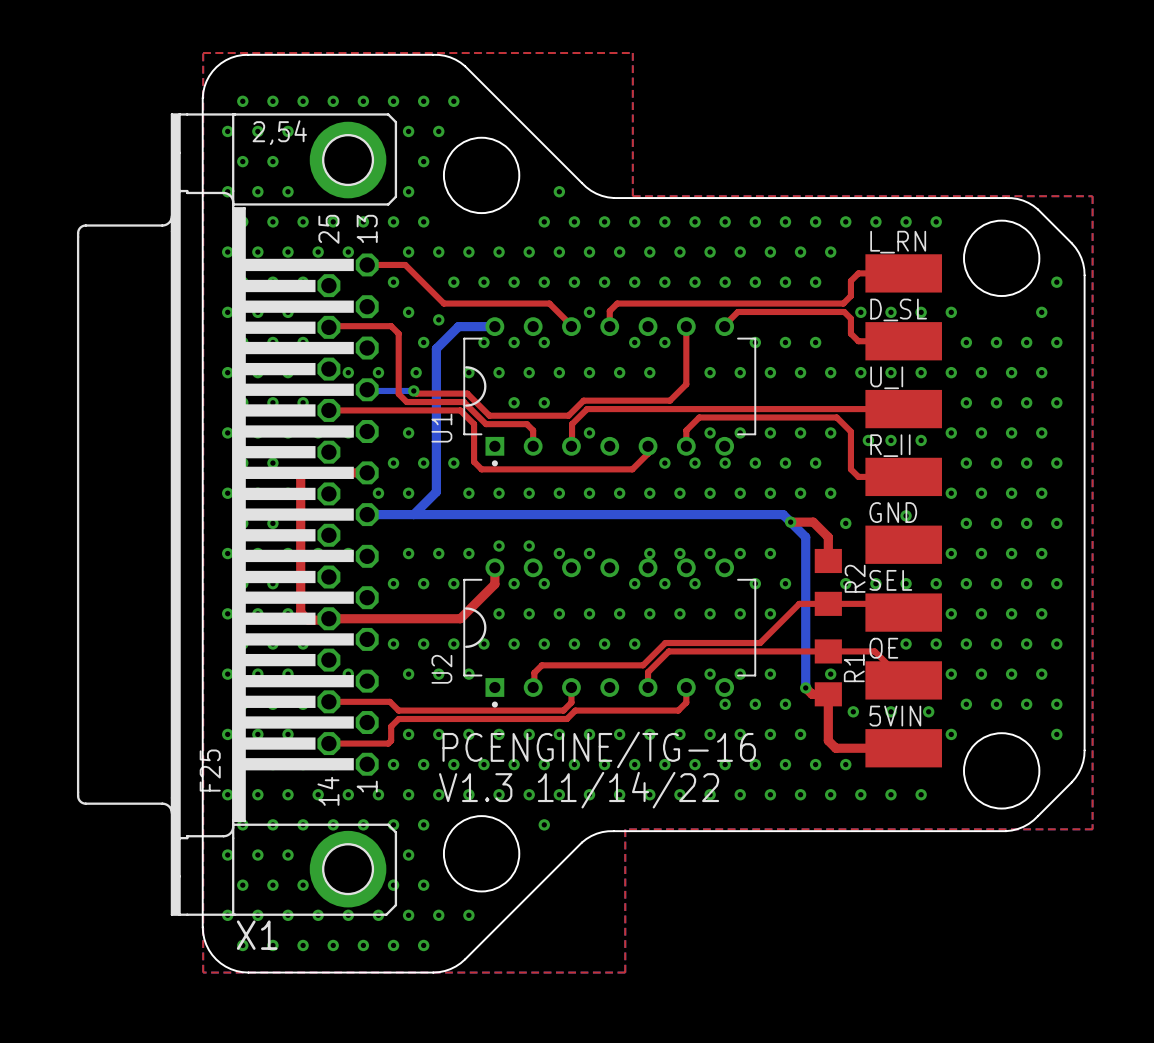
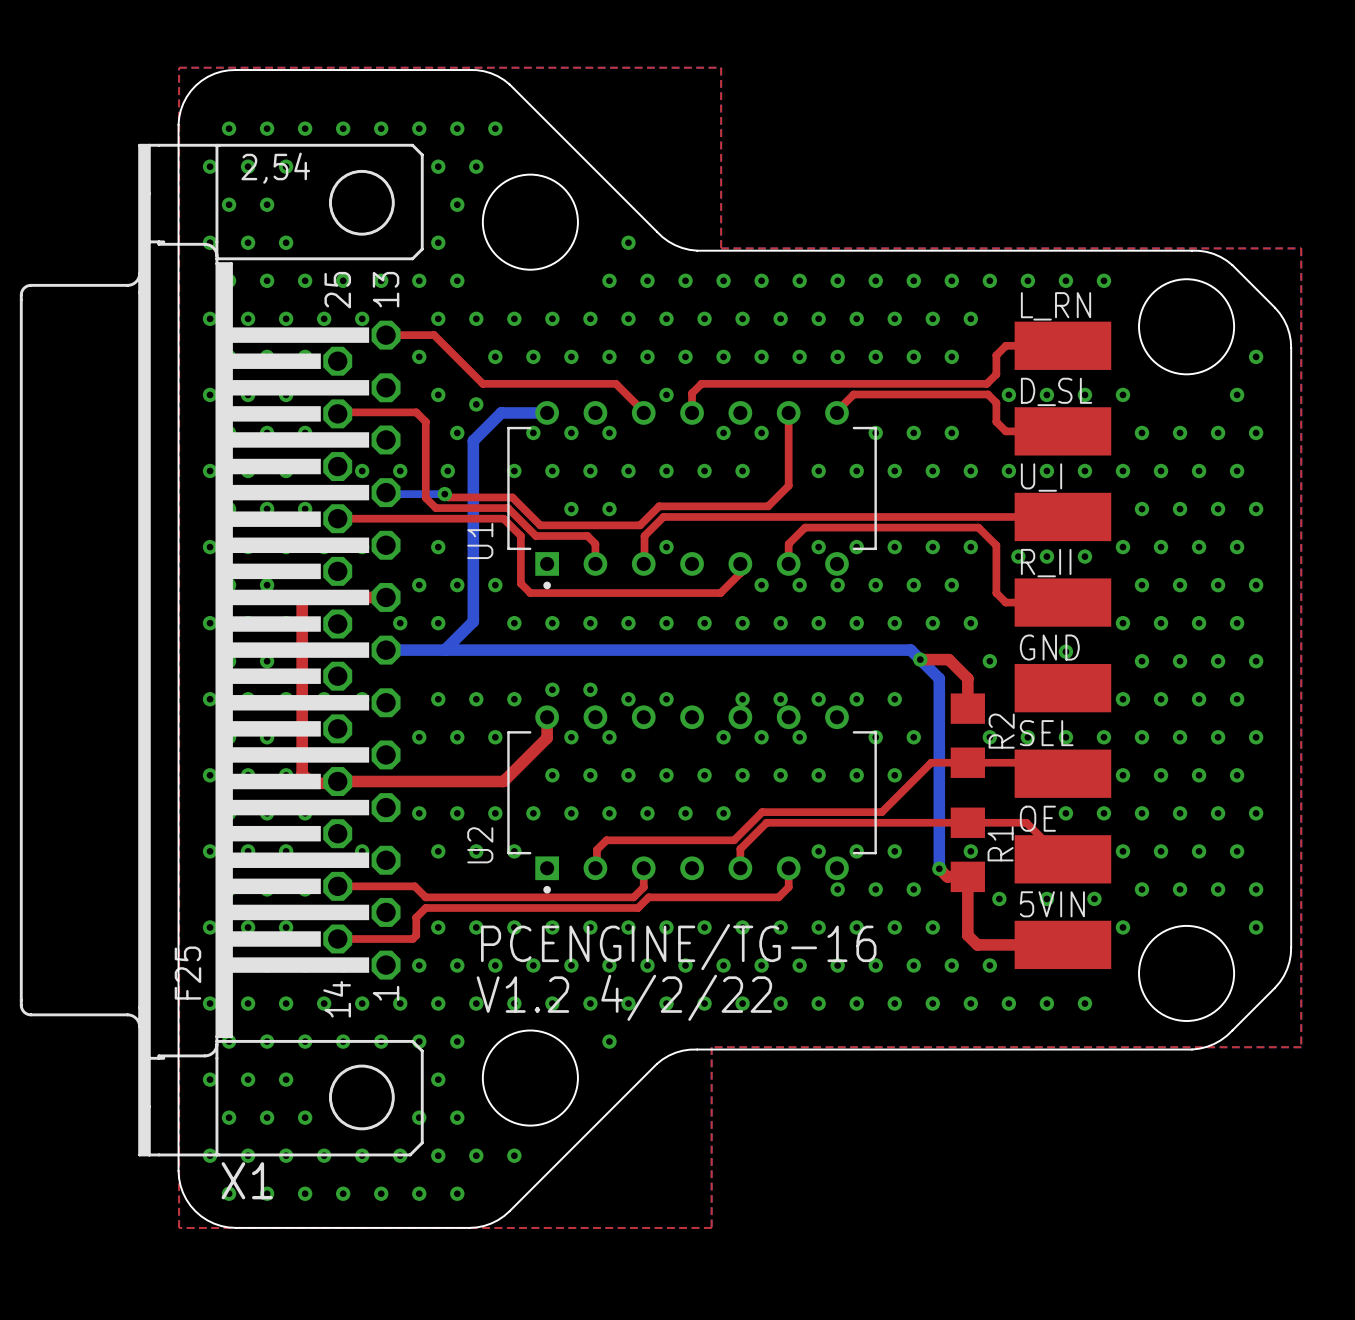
X1 footprint: [76, 113, 398, 916] -> [19, 143, 424, 1157]
U1 footprint: [463, 317, 757, 467] -> [507, 401, 877, 590]
U2 footprint: [463, 558, 757, 708] -> [507, 705, 877, 894]
text: V1.3 11/14/22 (579, 790) -> V1.2 4/2/22 (624, 997)

